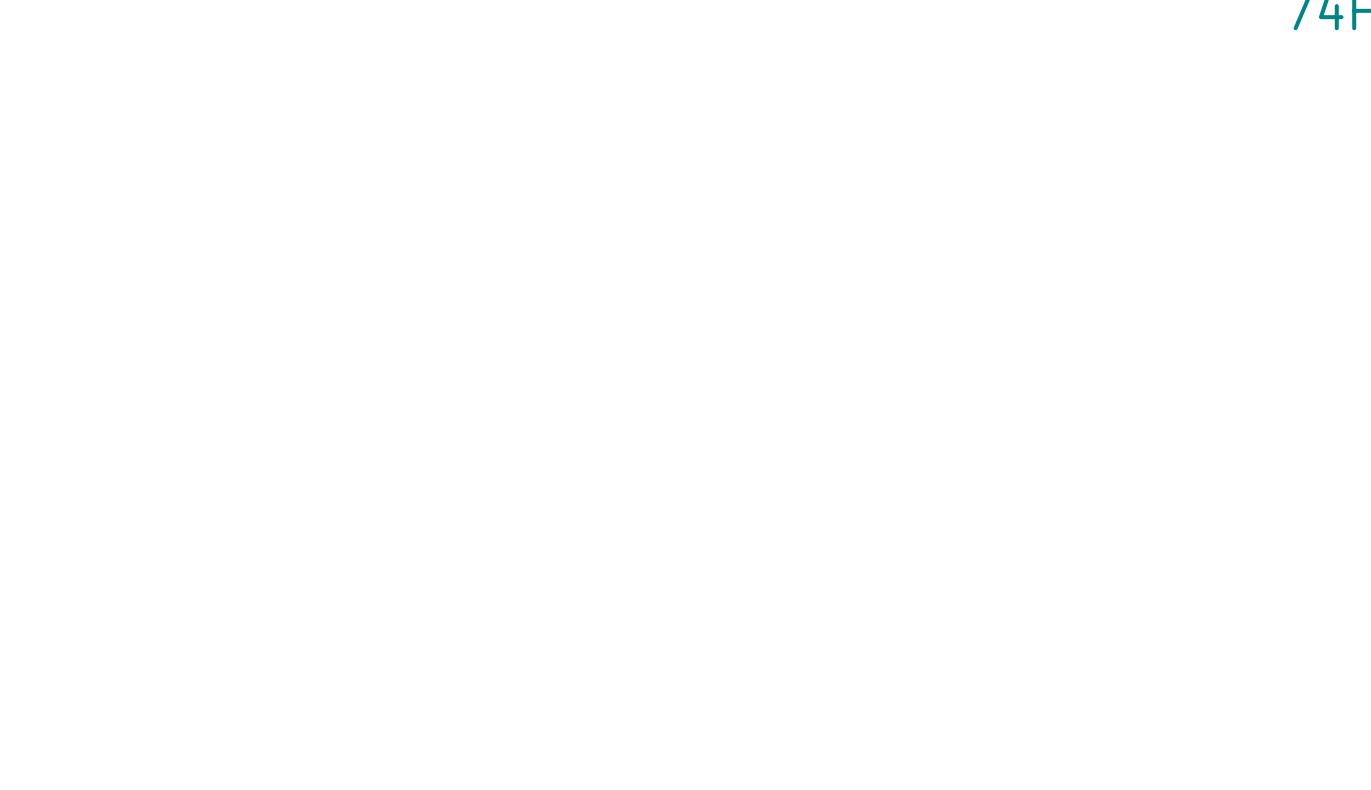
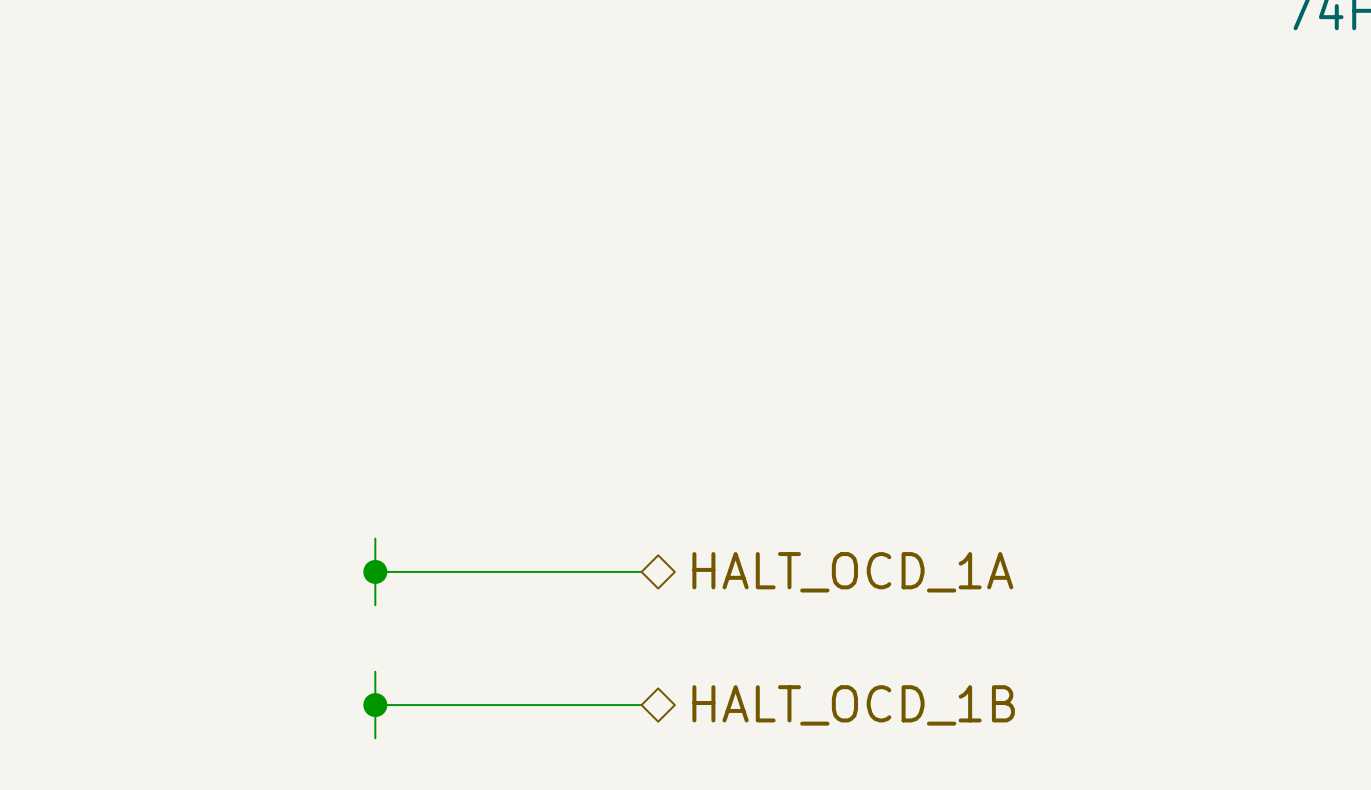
wire: none -> (375, 538) (375, 605)
wire: none -> (375, 571) (641, 571)
junction: none -> (375, 571)
hierarchical label: none -> HALT_OCD_1A (852, 572)
wire: none -> (375, 671) (375, 738)
wire: none -> (375, 705) (641, 705)
junction: none -> (375, 705)
hierarchical label: none -> HALT_OCD_1B (853, 705)

